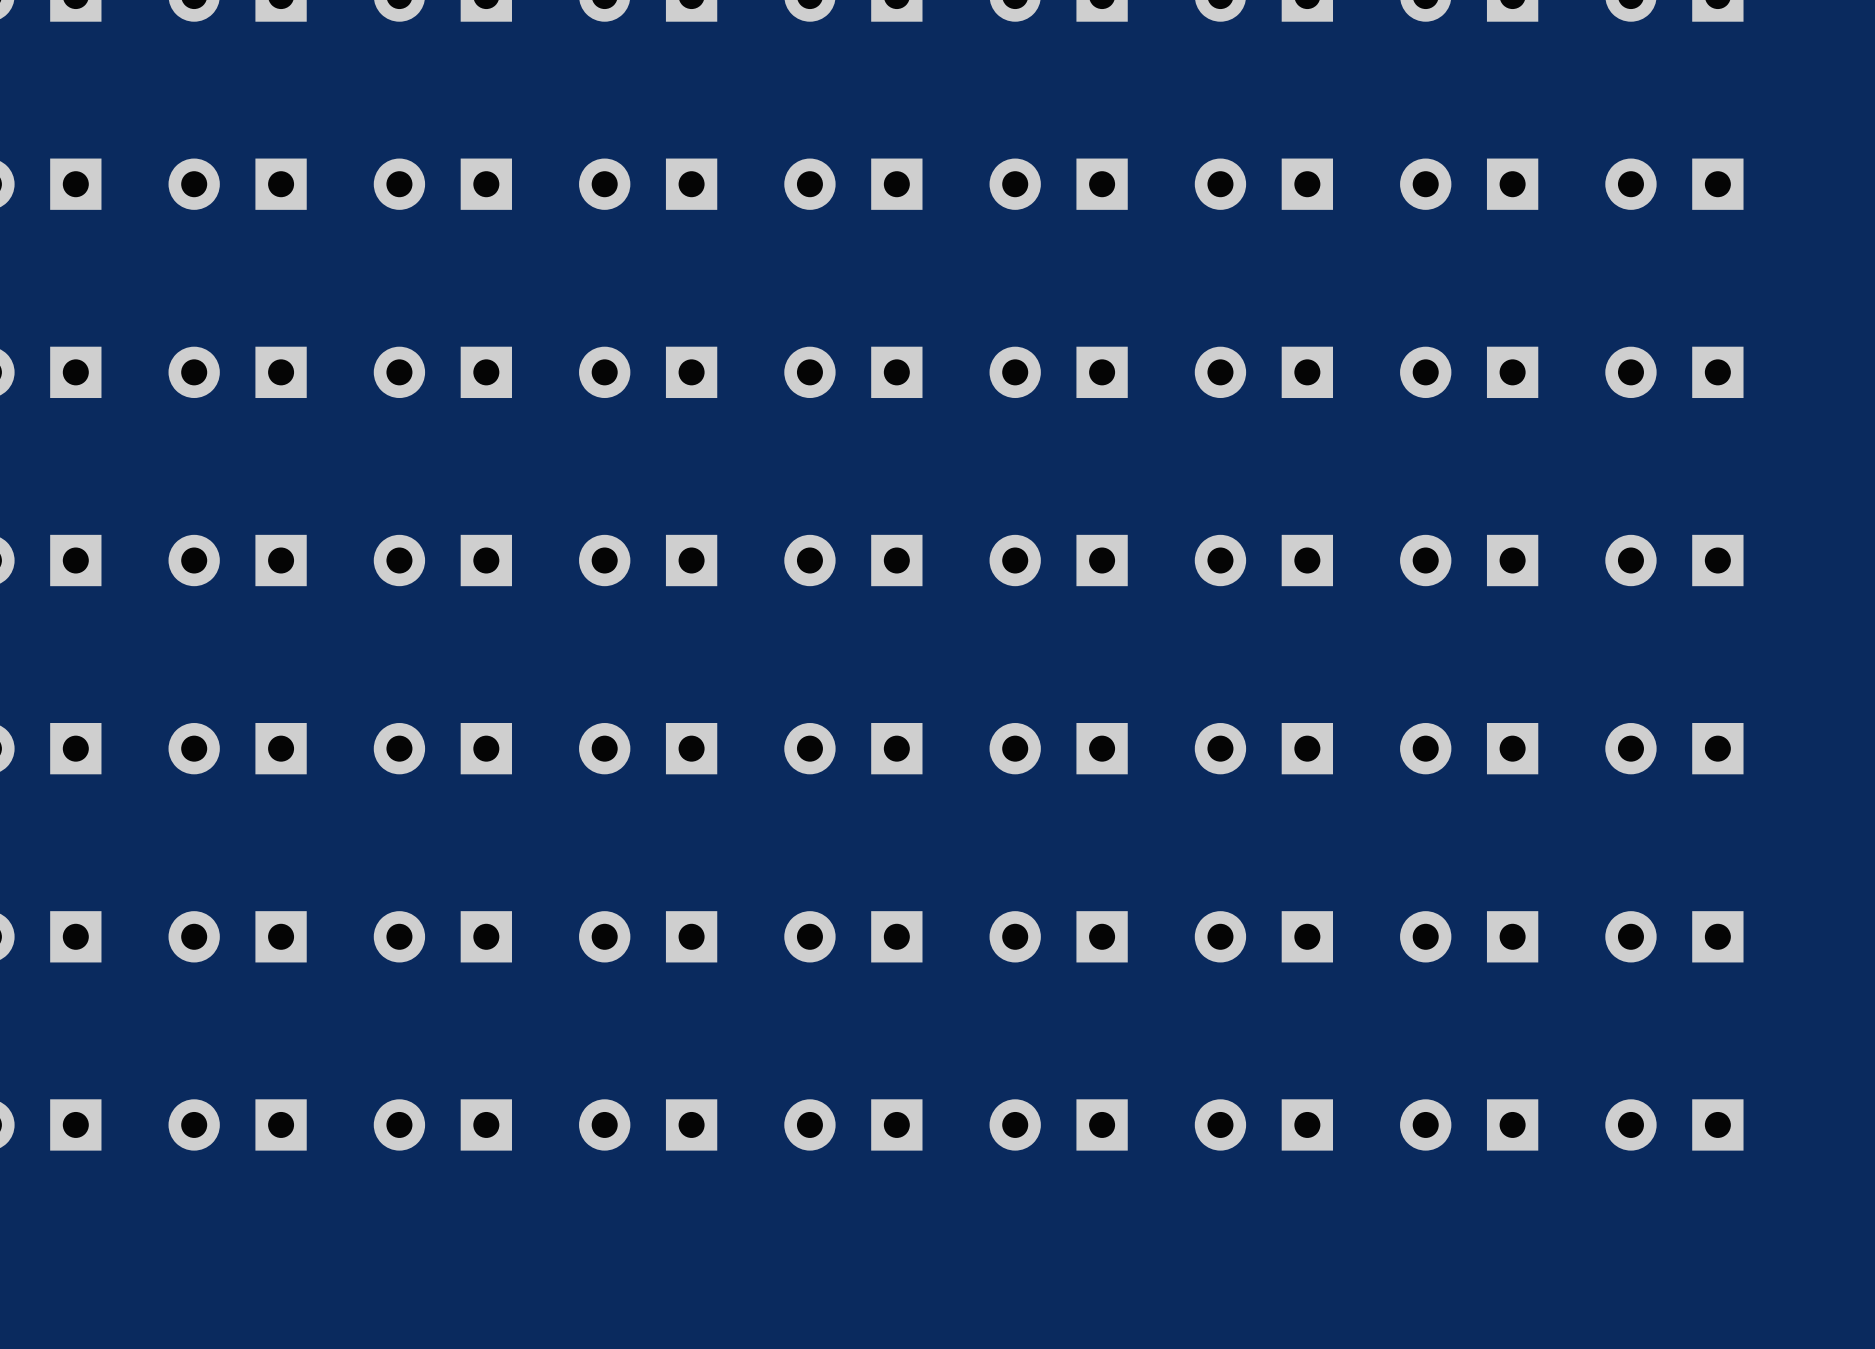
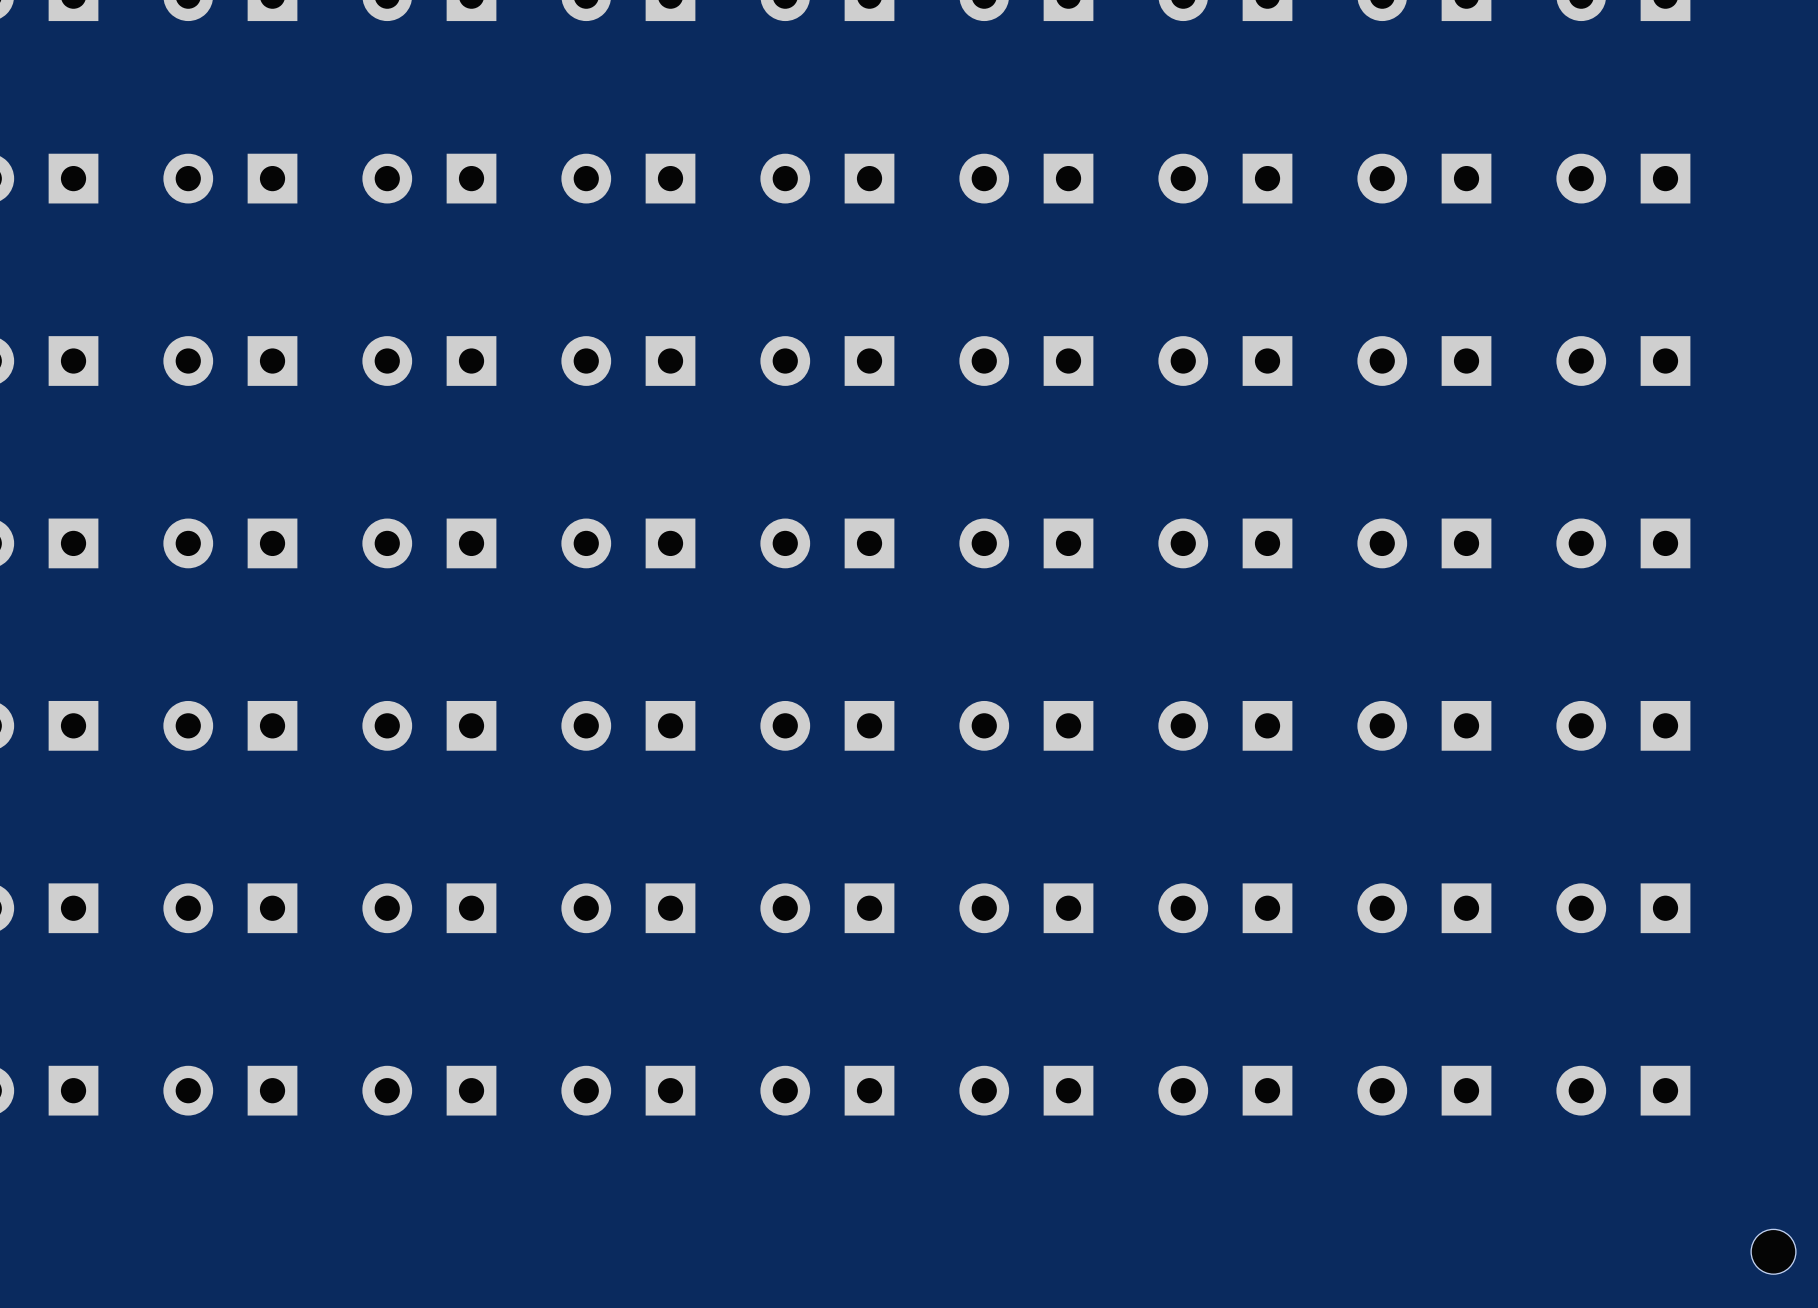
part: none -> (1773, 1251)

